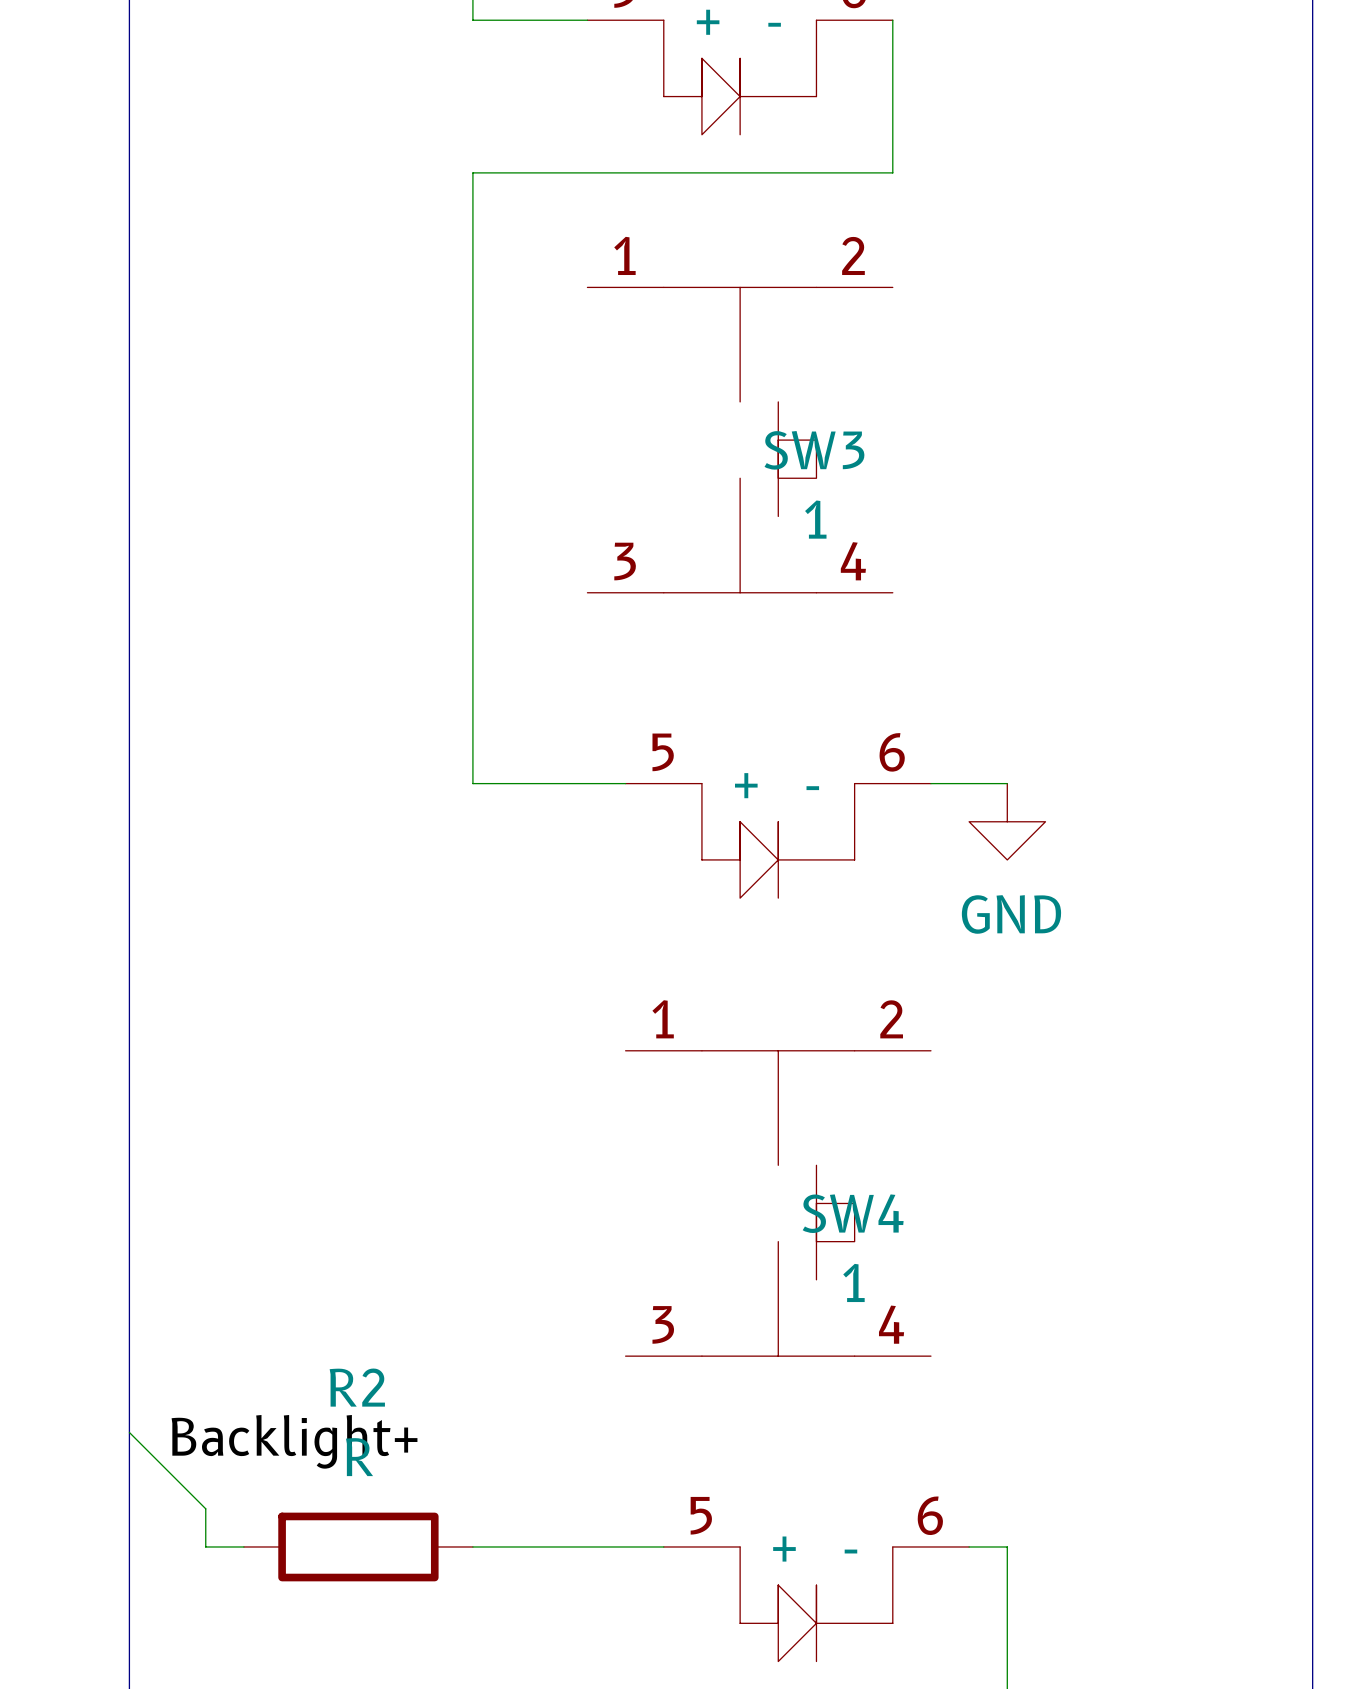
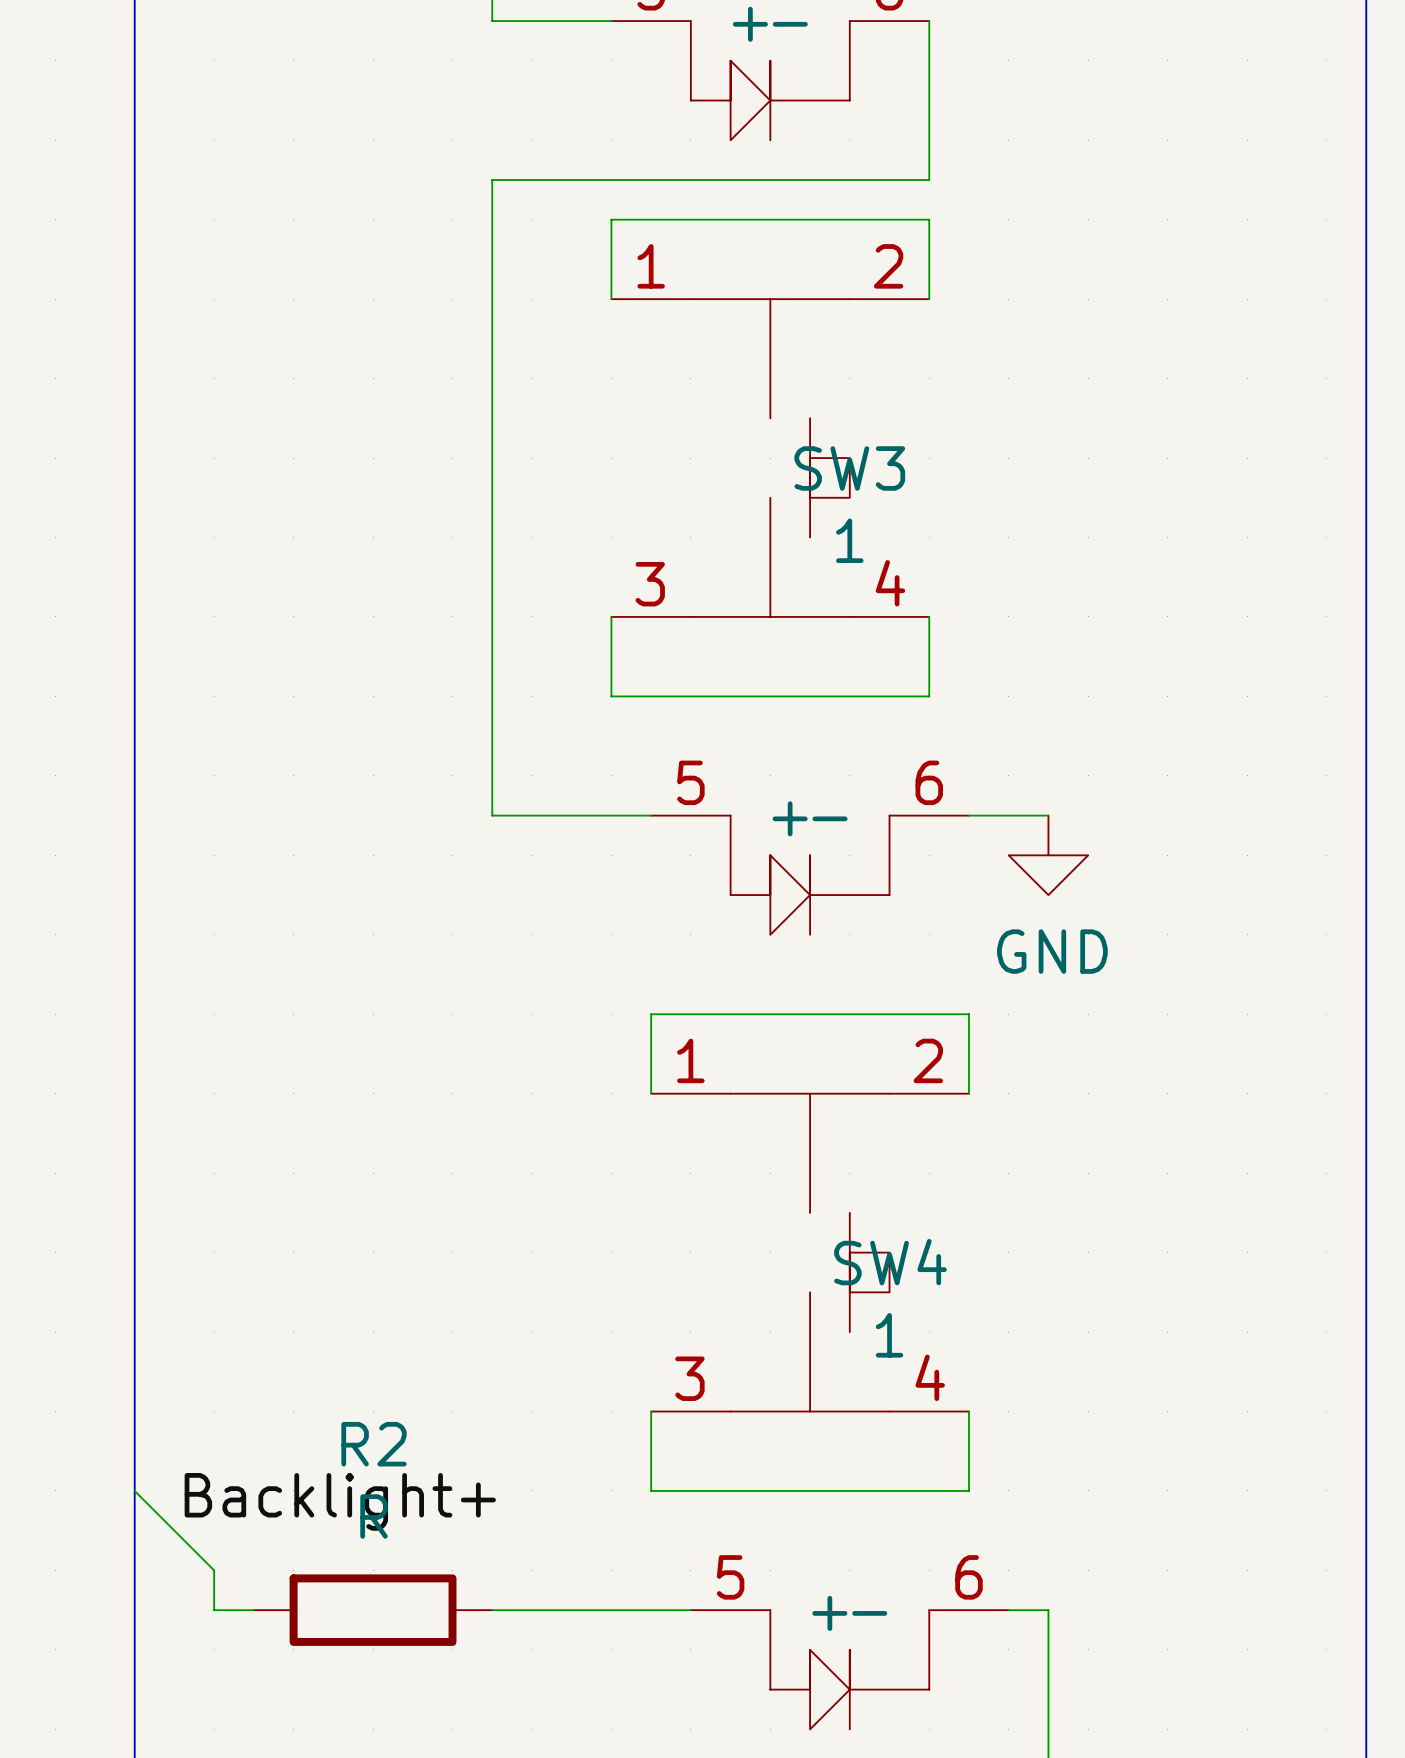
wire: none -> (611, 299) (611, 219) (929, 219) (929, 299)
wire: none -> (611, 616) (611, 696) (929, 696) (929, 616)
wire: none -> (651, 1093) (651, 1014) (968, 1014) (968, 1093)
wire: none -> (651, 1411) (651, 1490) (968, 1490) (968, 1411)

